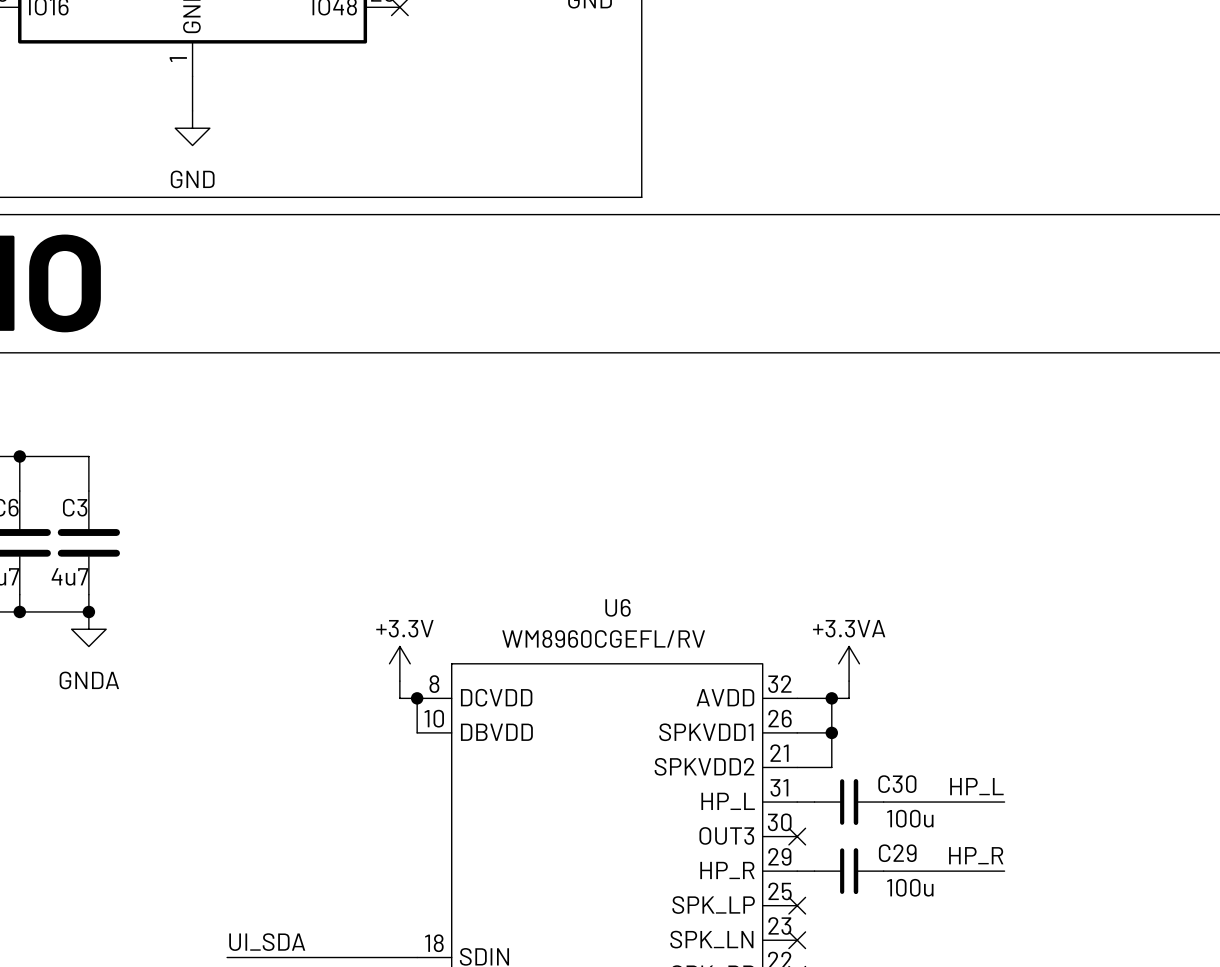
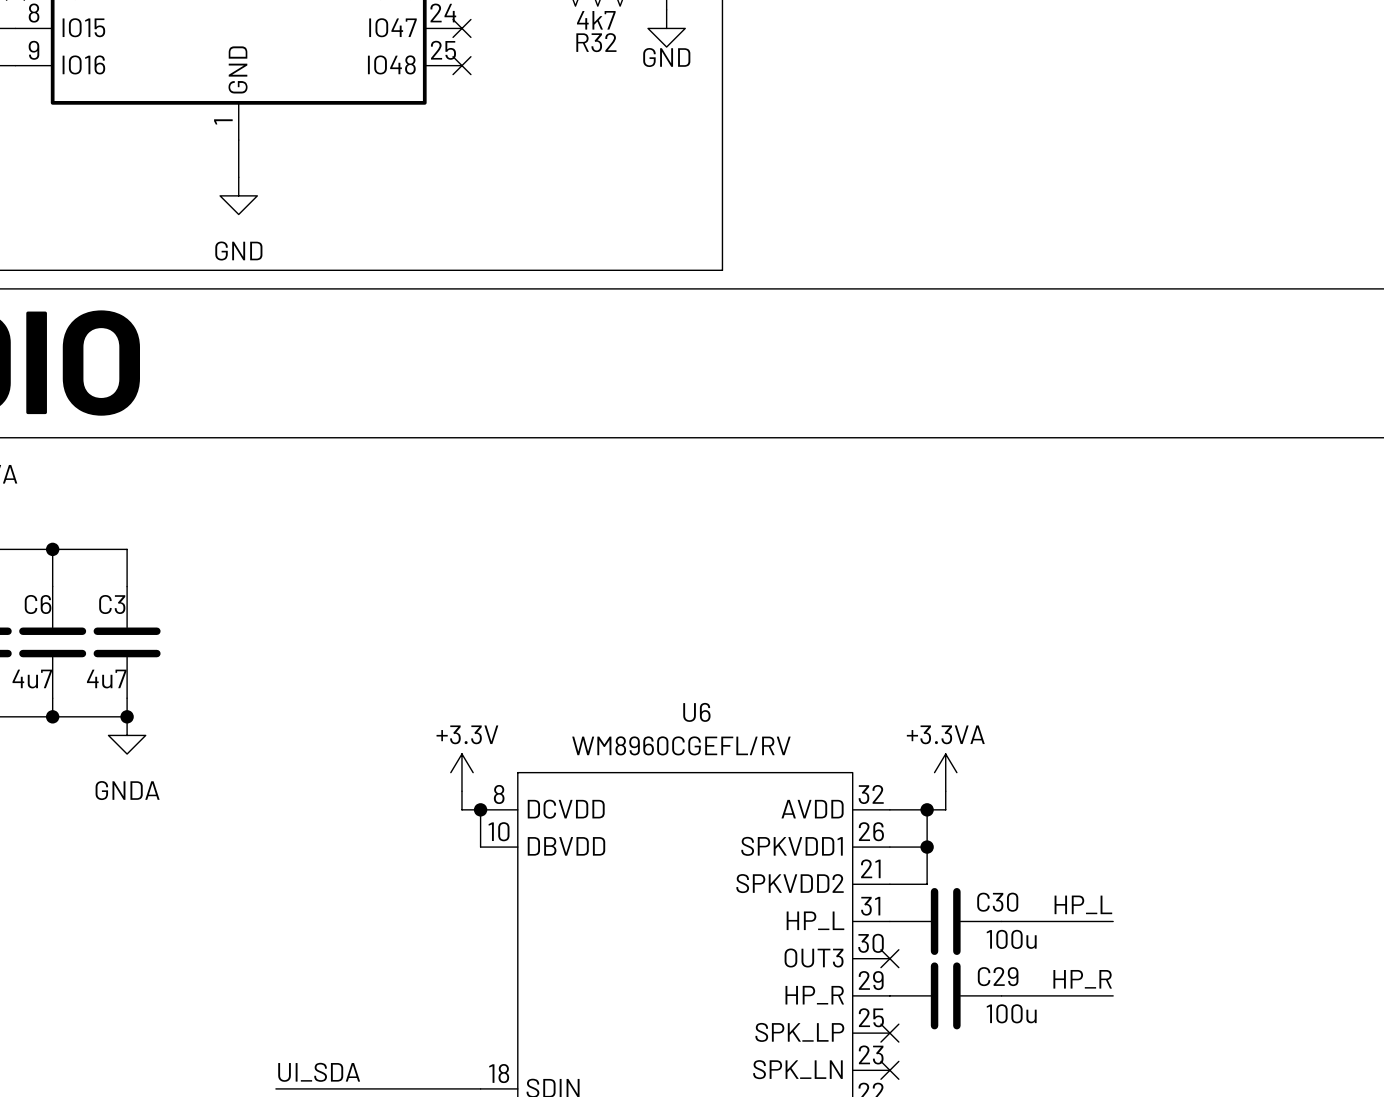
C30 symbol: [814, 779, 884, 826] -> [889, 887, 1002, 955]
C29 symbol: [814, 848, 884, 895] -> [889, 962, 1002, 1030]

